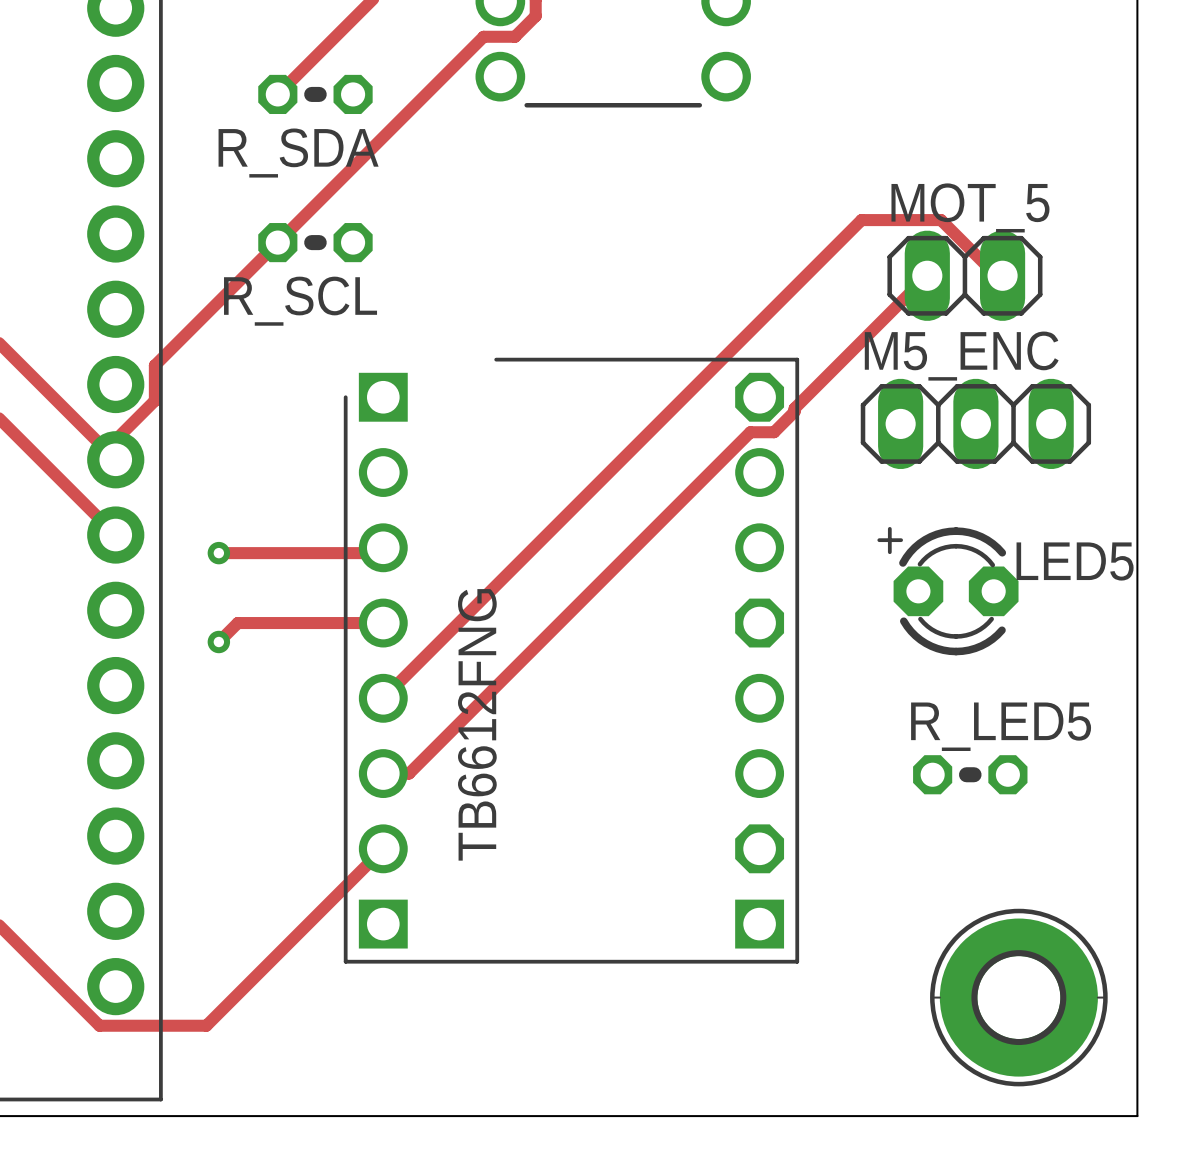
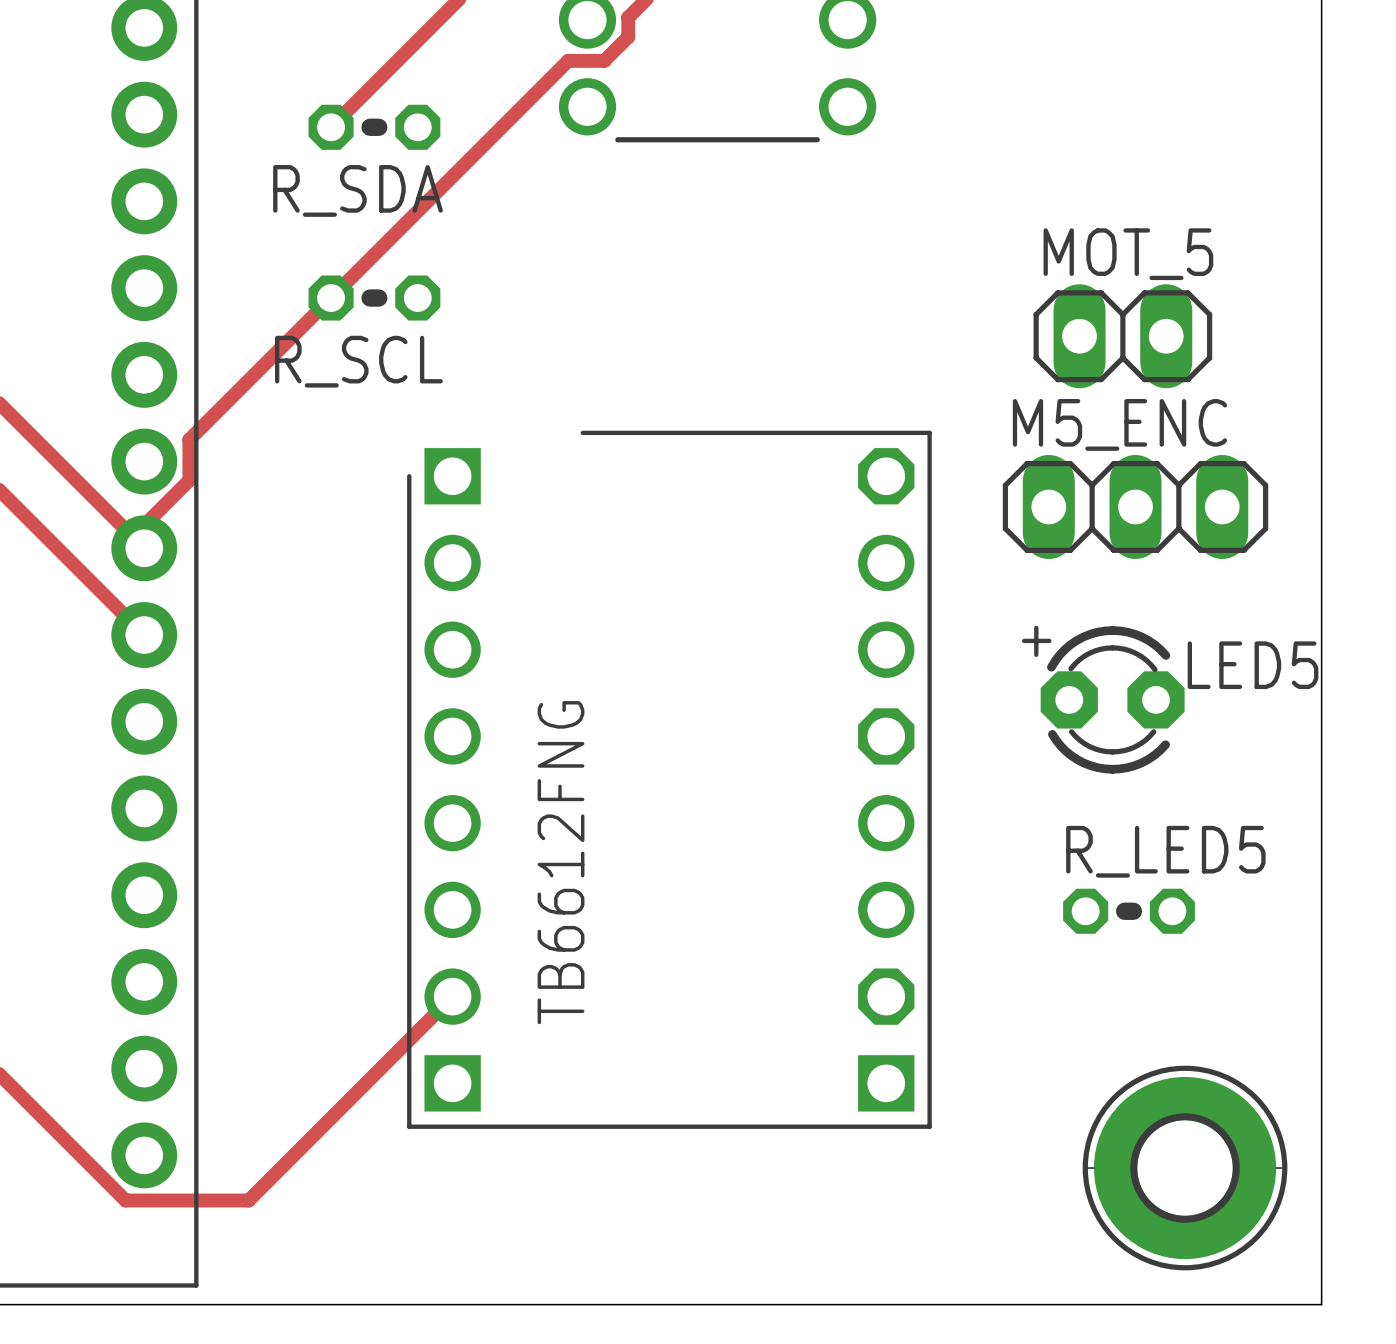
track: (927, 275) (794, 408) (794, 411) (774, 432) (750, 432) (409, 773) (383, 773) -> none
track: (1002, 275) (996, 275) (941, 220) (861, 220) (383, 698) -> none
track: (383, 547) (377, 553) (218, 553) -> none
via: (218, 553) -> none
track: (383, 623) (237, 623) (218, 642) -> none
via: (218, 642) -> none

